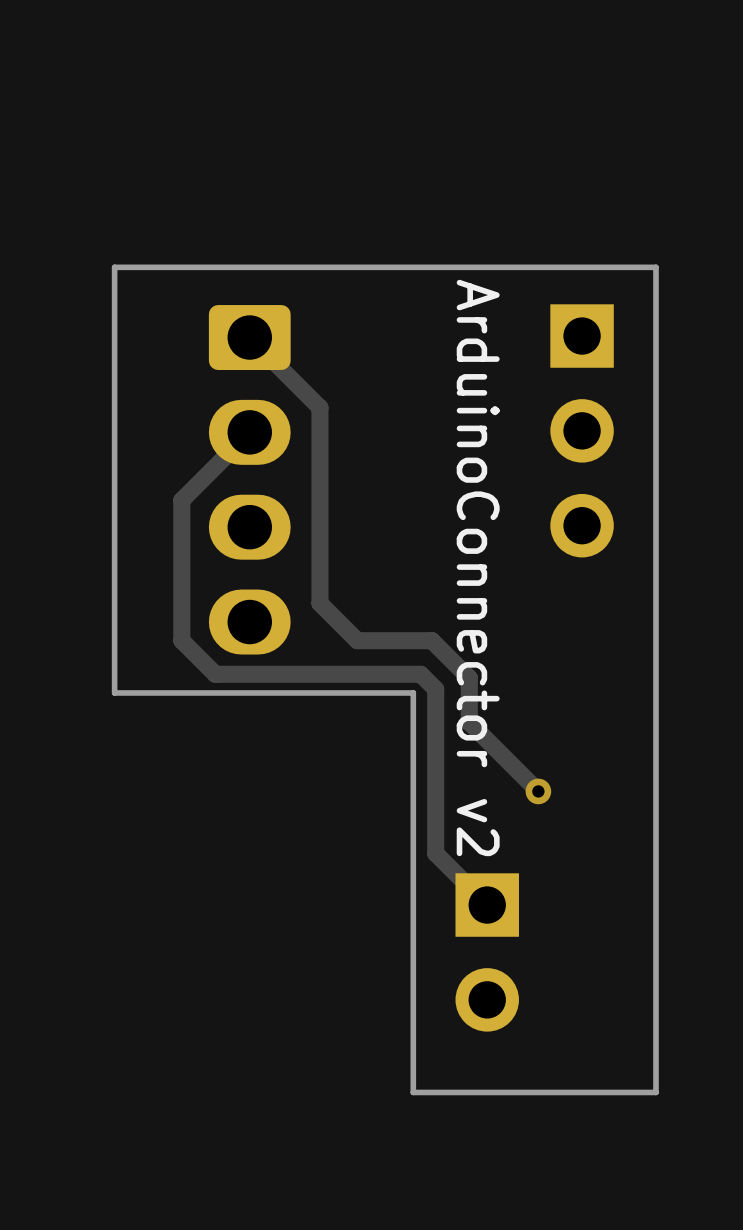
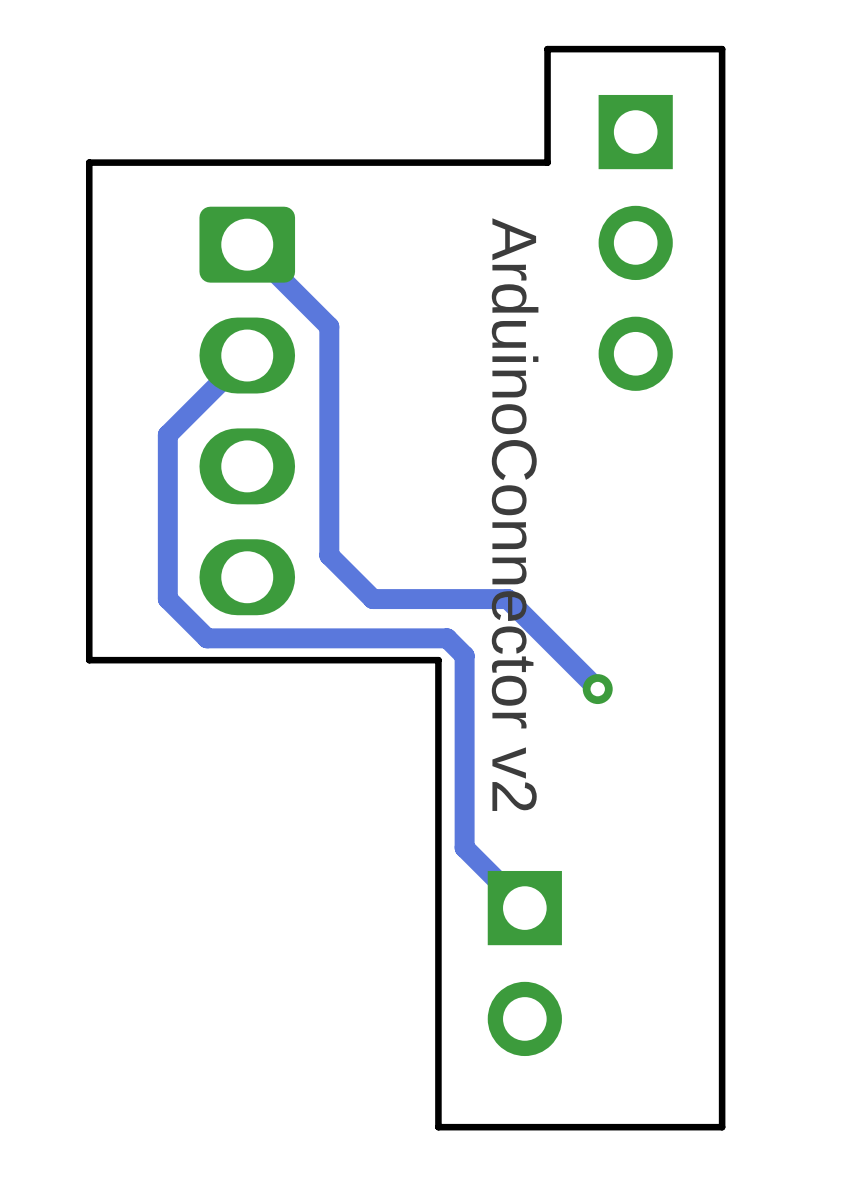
board edge: (655, 267) (506, 267) -> (722, 162) (722, 49) (547, 49) (547, 162)
part position: (582, 430) -> (635, 242)
track: (431, 640) (469, 678) (469, 722) (538, 791) -> (460, 599) (507, 599) (597, 689)
via position: (538, 791) -> (597, 689)

